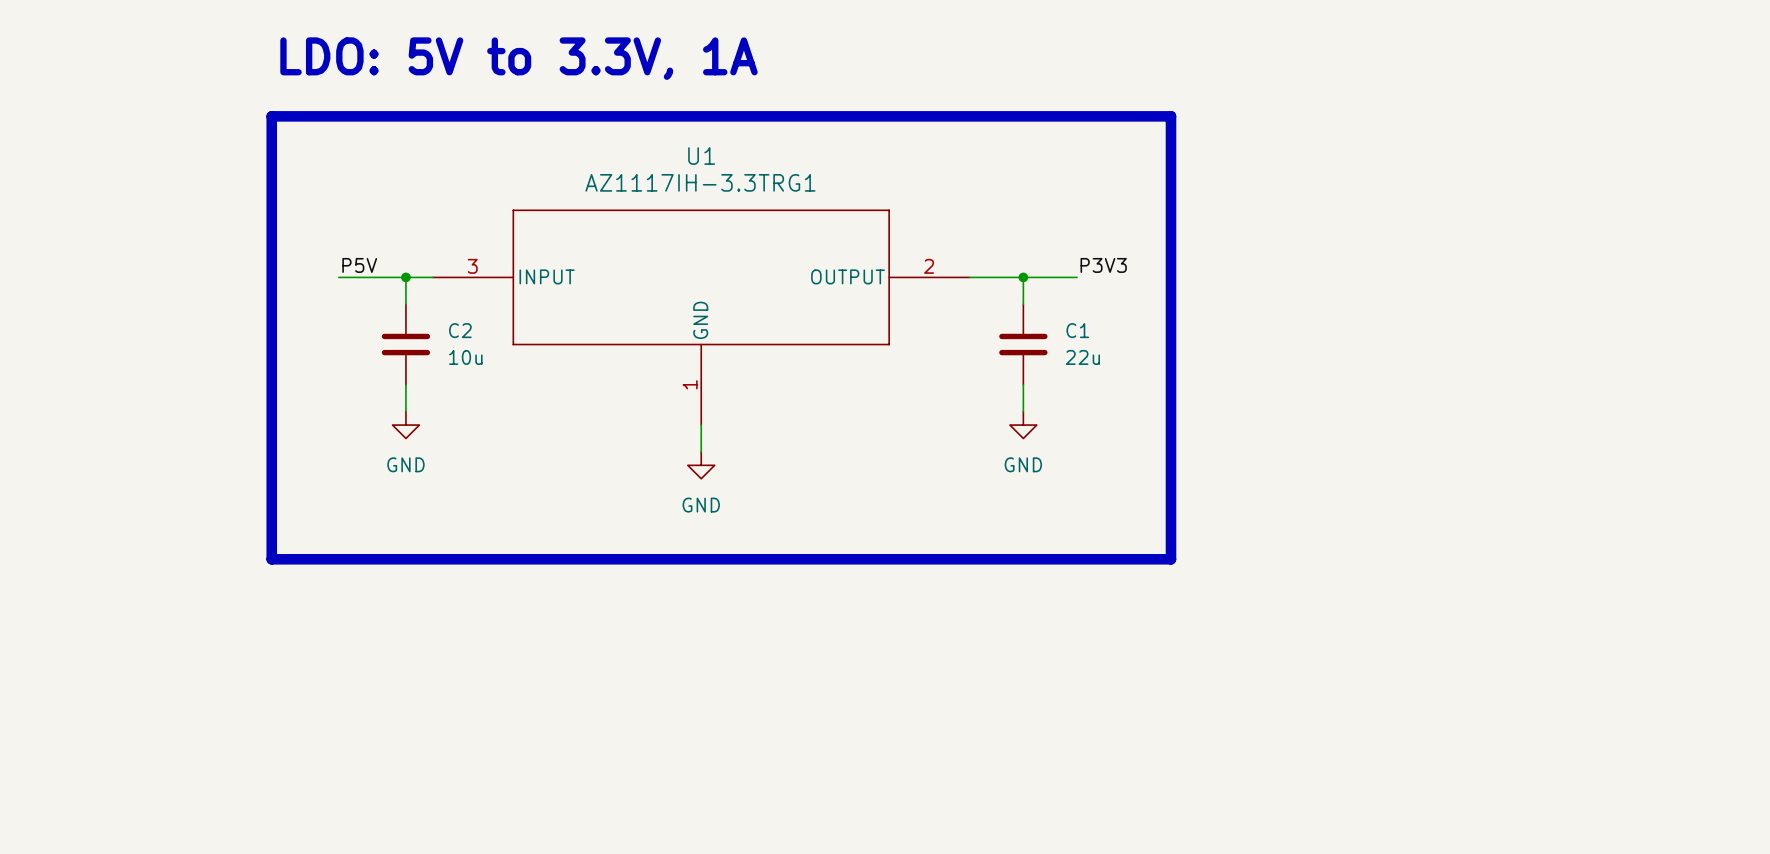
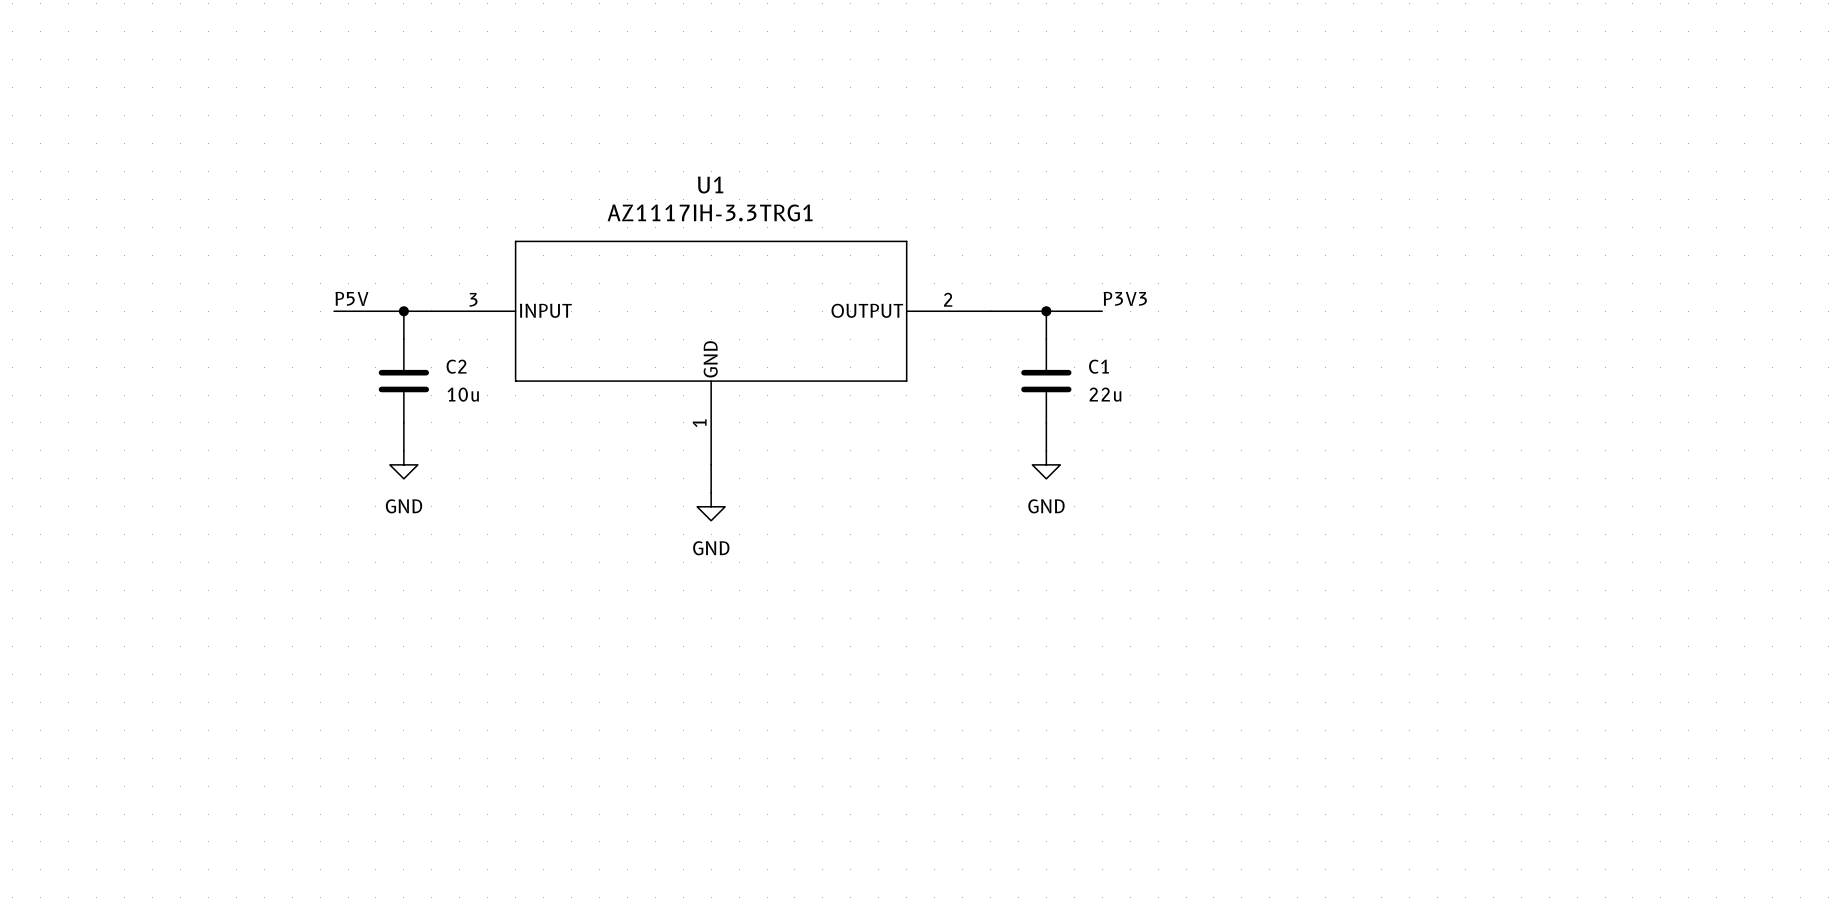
text: LDO: 5V to 3.3V, 1A (518, 58) -> none
line: (271, 116) (1171, 116) (1171, 559) (271, 559) (271, 116) -> none

